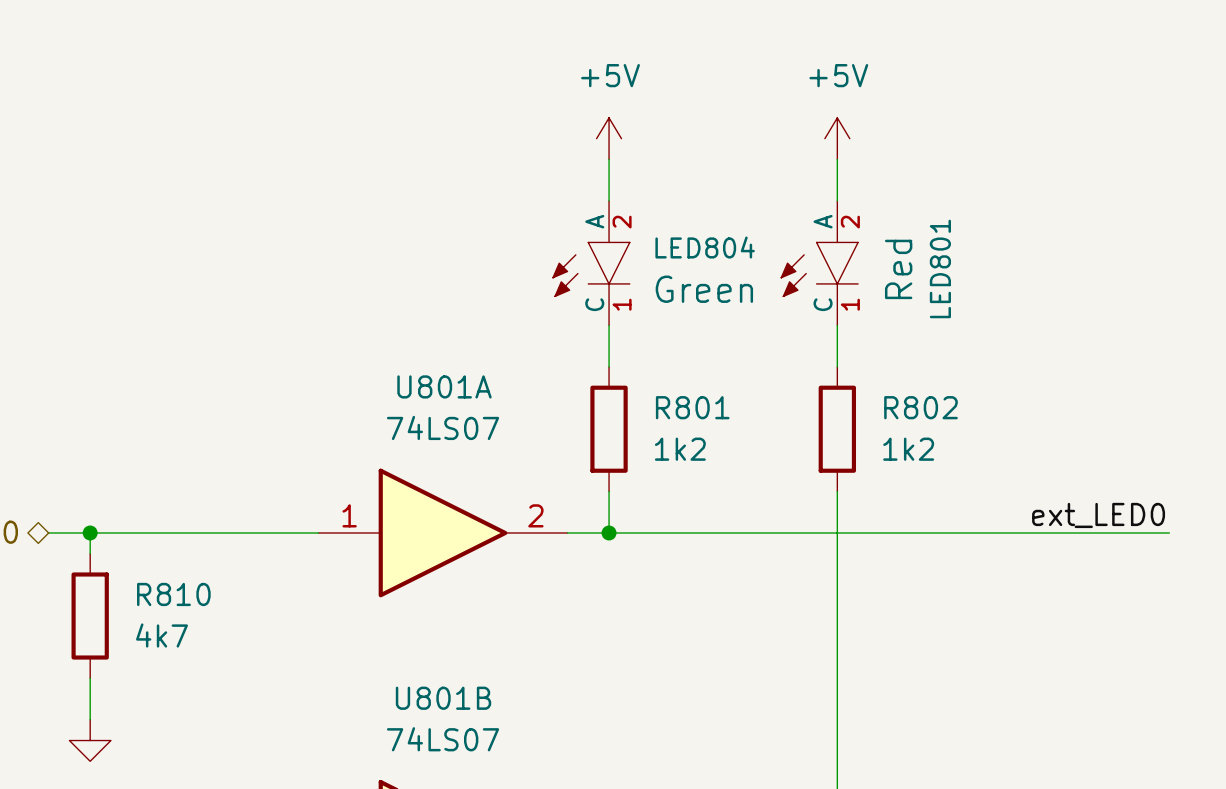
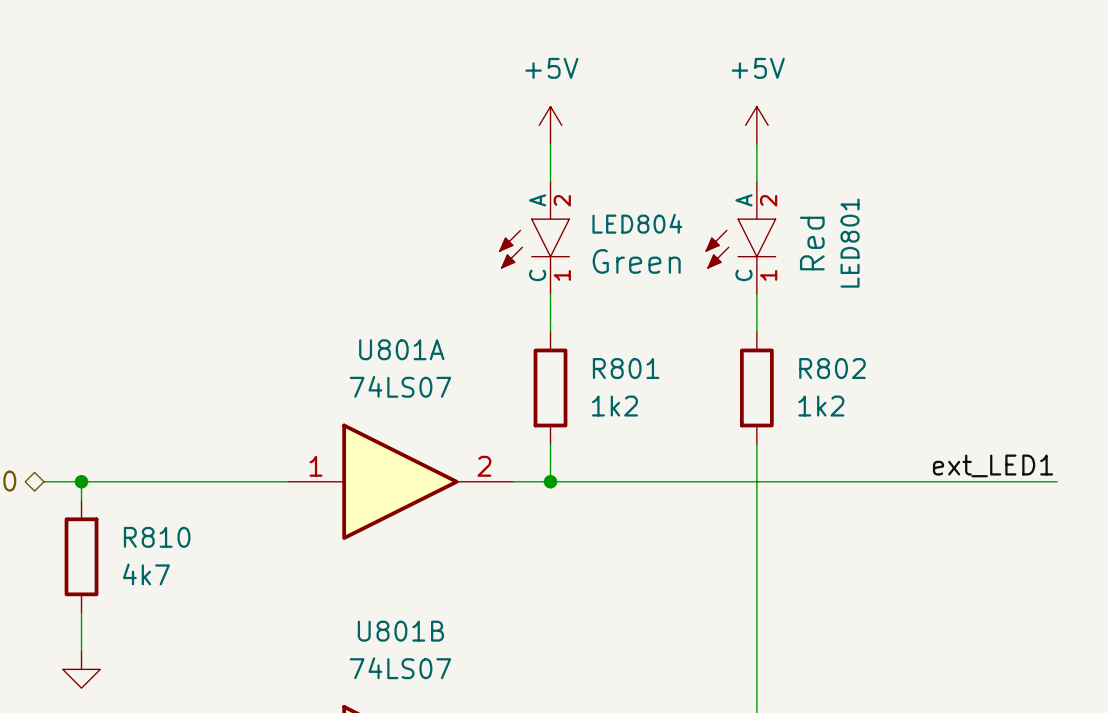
label: ext_LED0 (1098, 515) -> ext_LED1 (993, 465)

